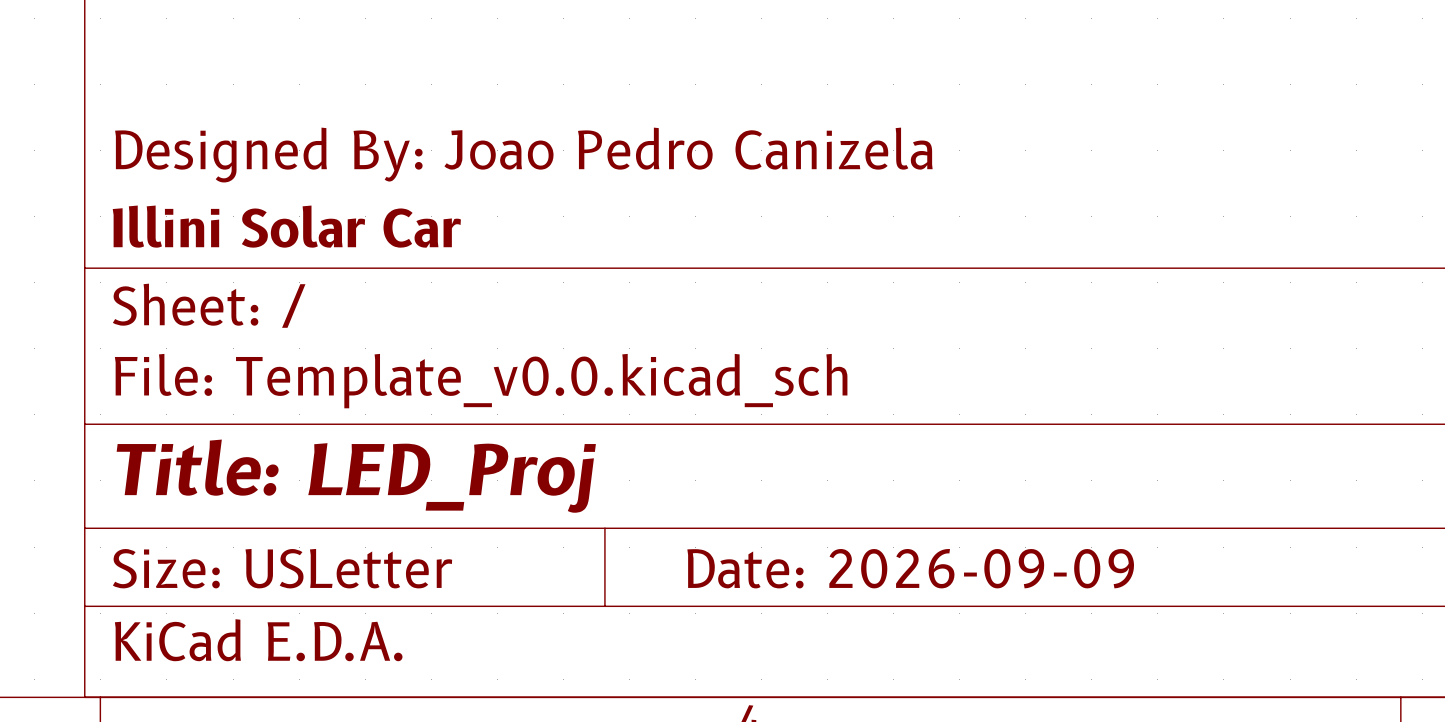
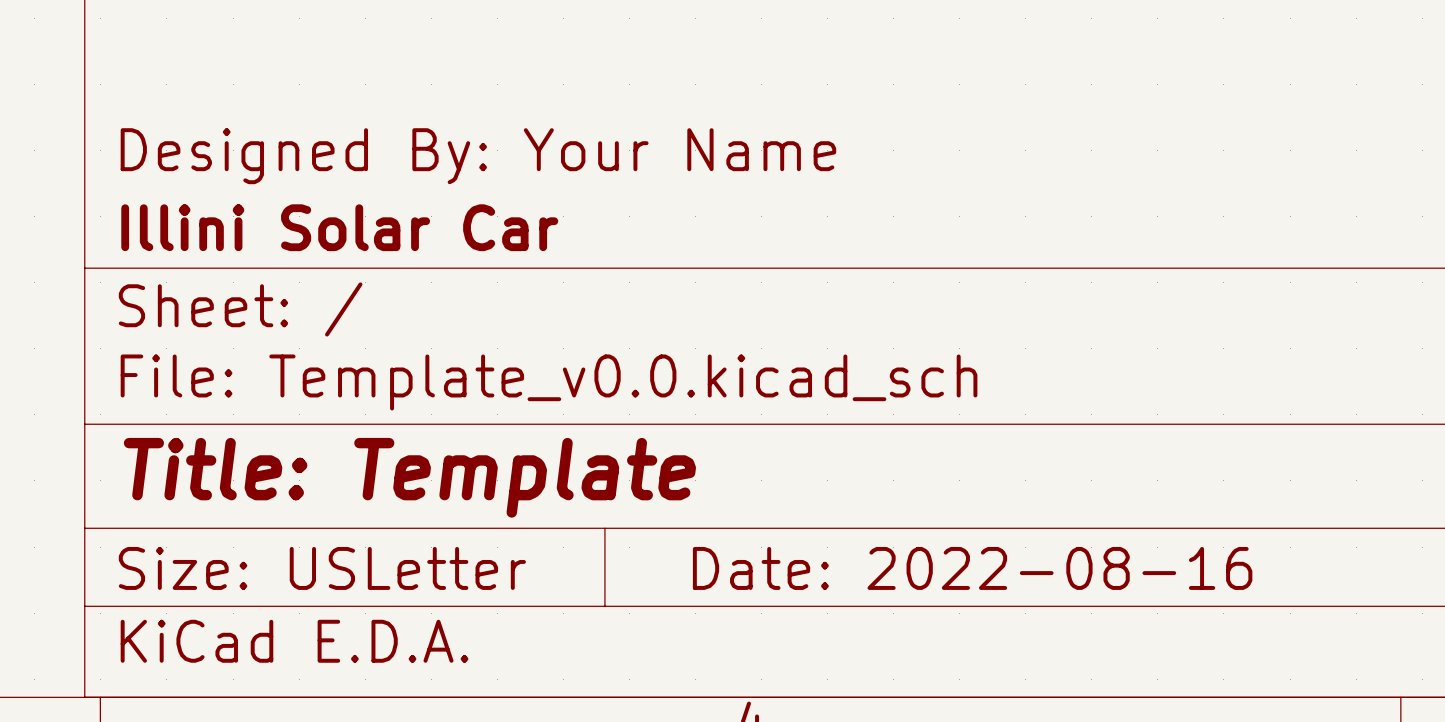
title block: Designed By: Joao Pedro Canizela (523, 155) -> Designed By: Your Name (478, 156)
title block: Title: LED_Proj (356, 476) -> Title: Template (409, 477)
title block: Date: 2026-09-09 (910, 568) -> Date: 2022-08-16 (972, 568)

